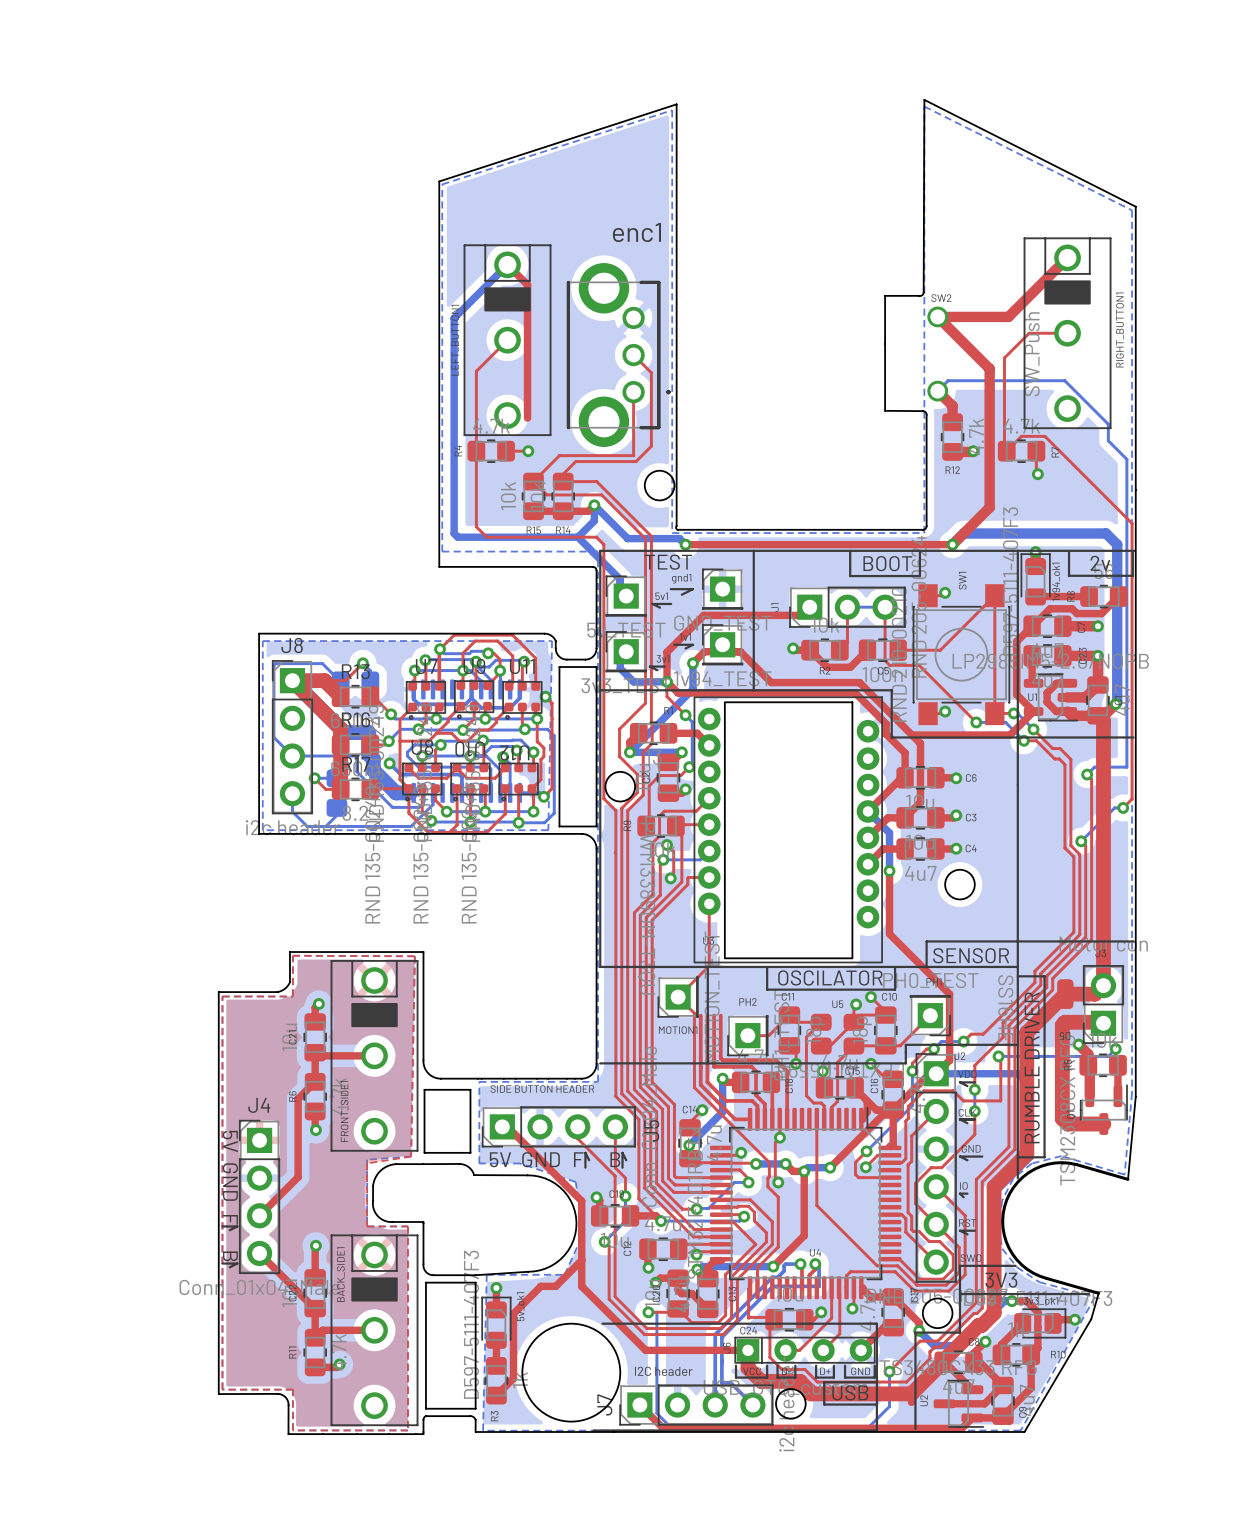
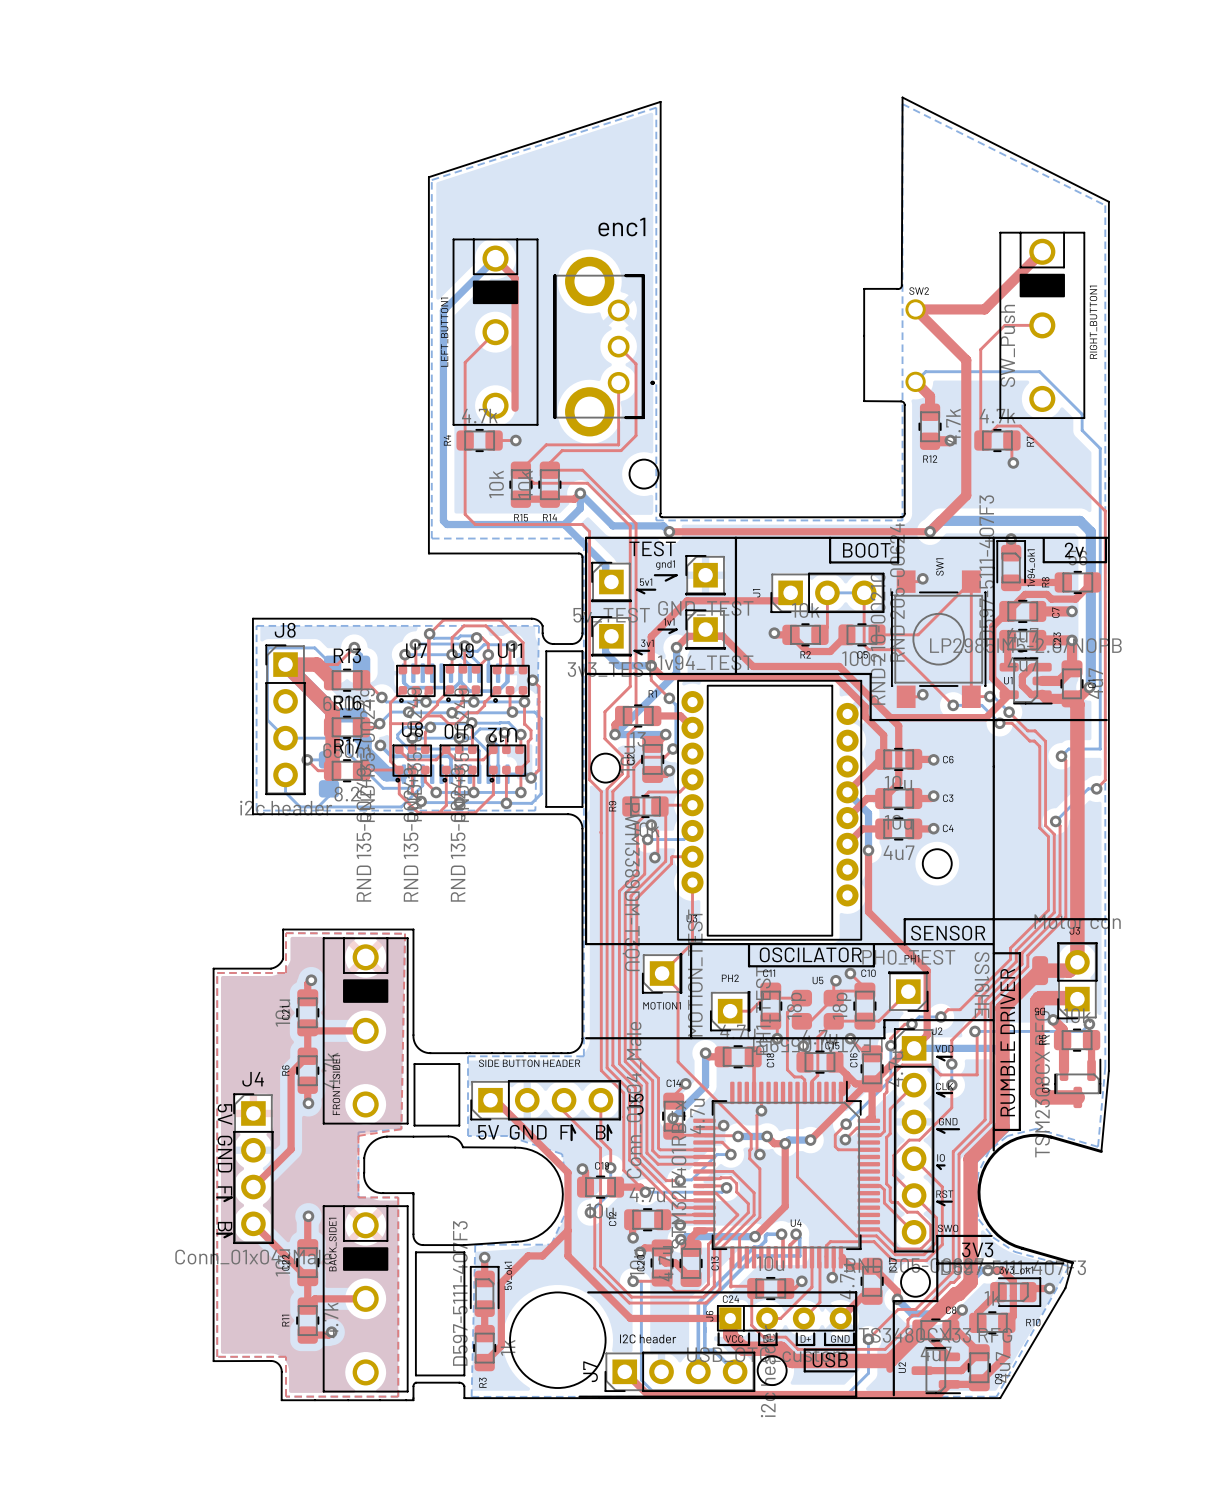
top track: (700, 1015) (700, 1084) (735, 1119) (750, 1119) -> none
top track: (707, 1015) (707, 1082) (726, 1100) (752, 1100) (757, 1106) (757, 1119) -> none
top track: (714, 1015) (714, 1066) (751, 1066) (756, 1071) (756, 1095) (764, 1104) (764, 1119) -> none
top track: (720, 1015) (720, 1058) (722, 1060) (776, 1060) (787, 1071) (787, 1119) -> none

